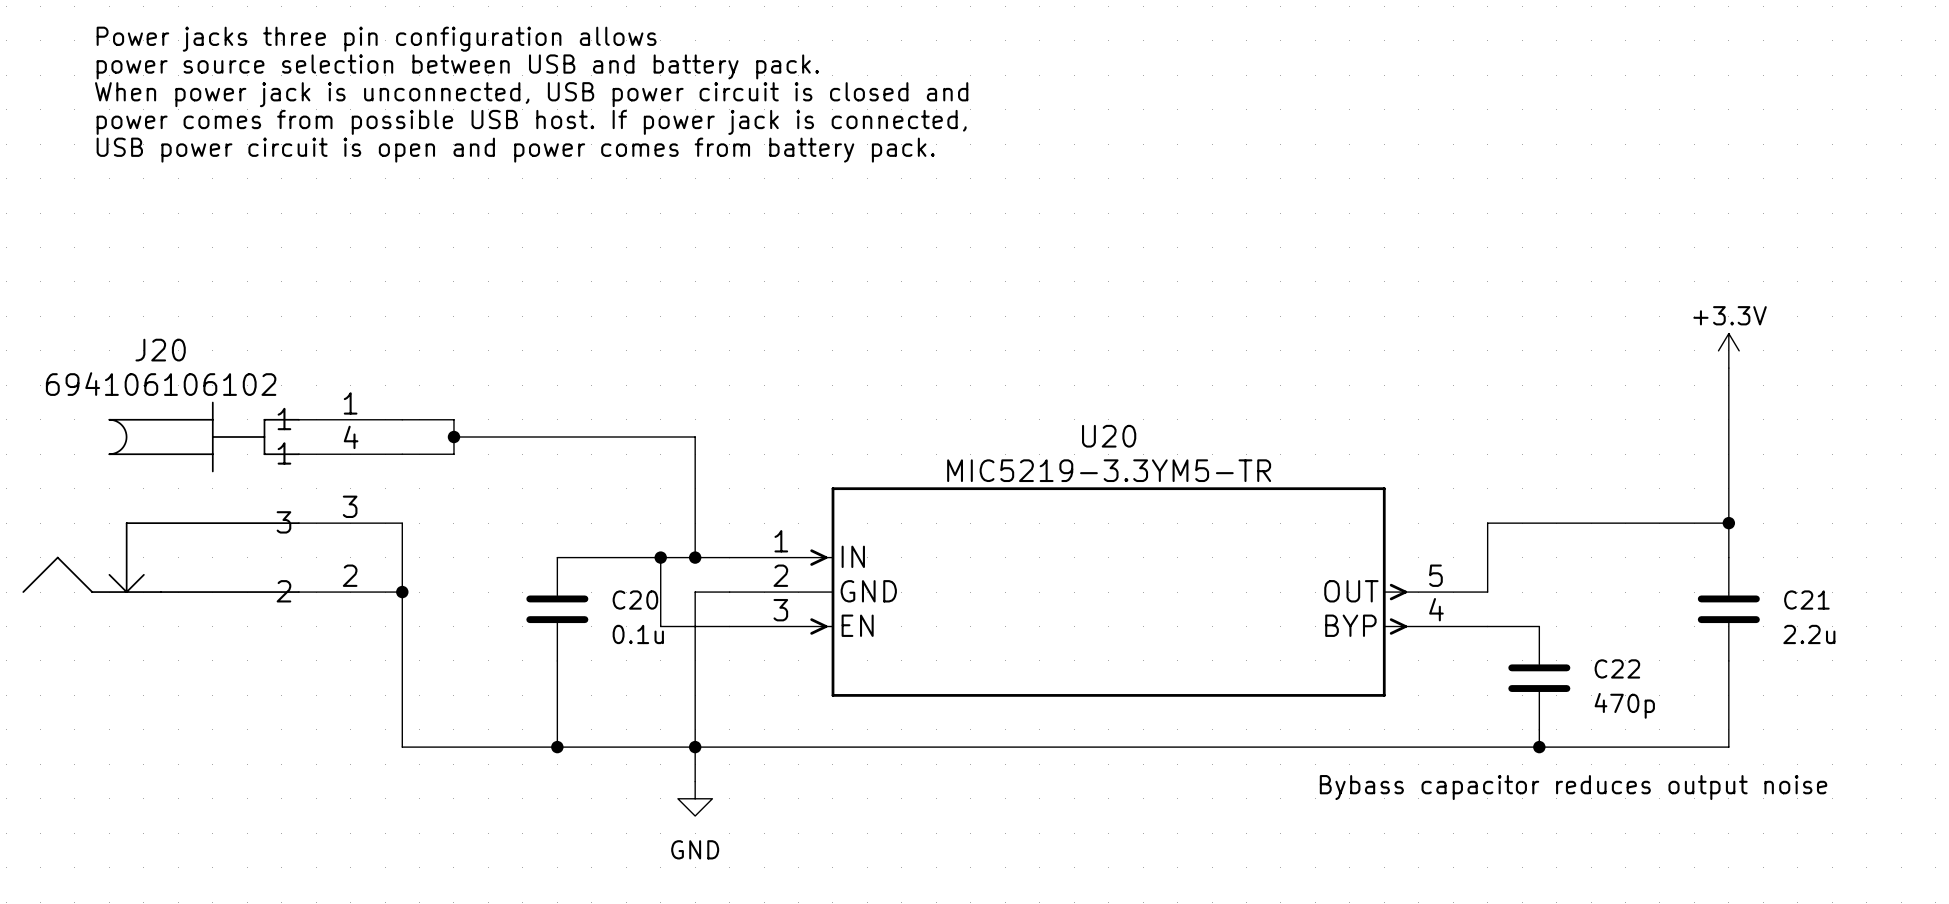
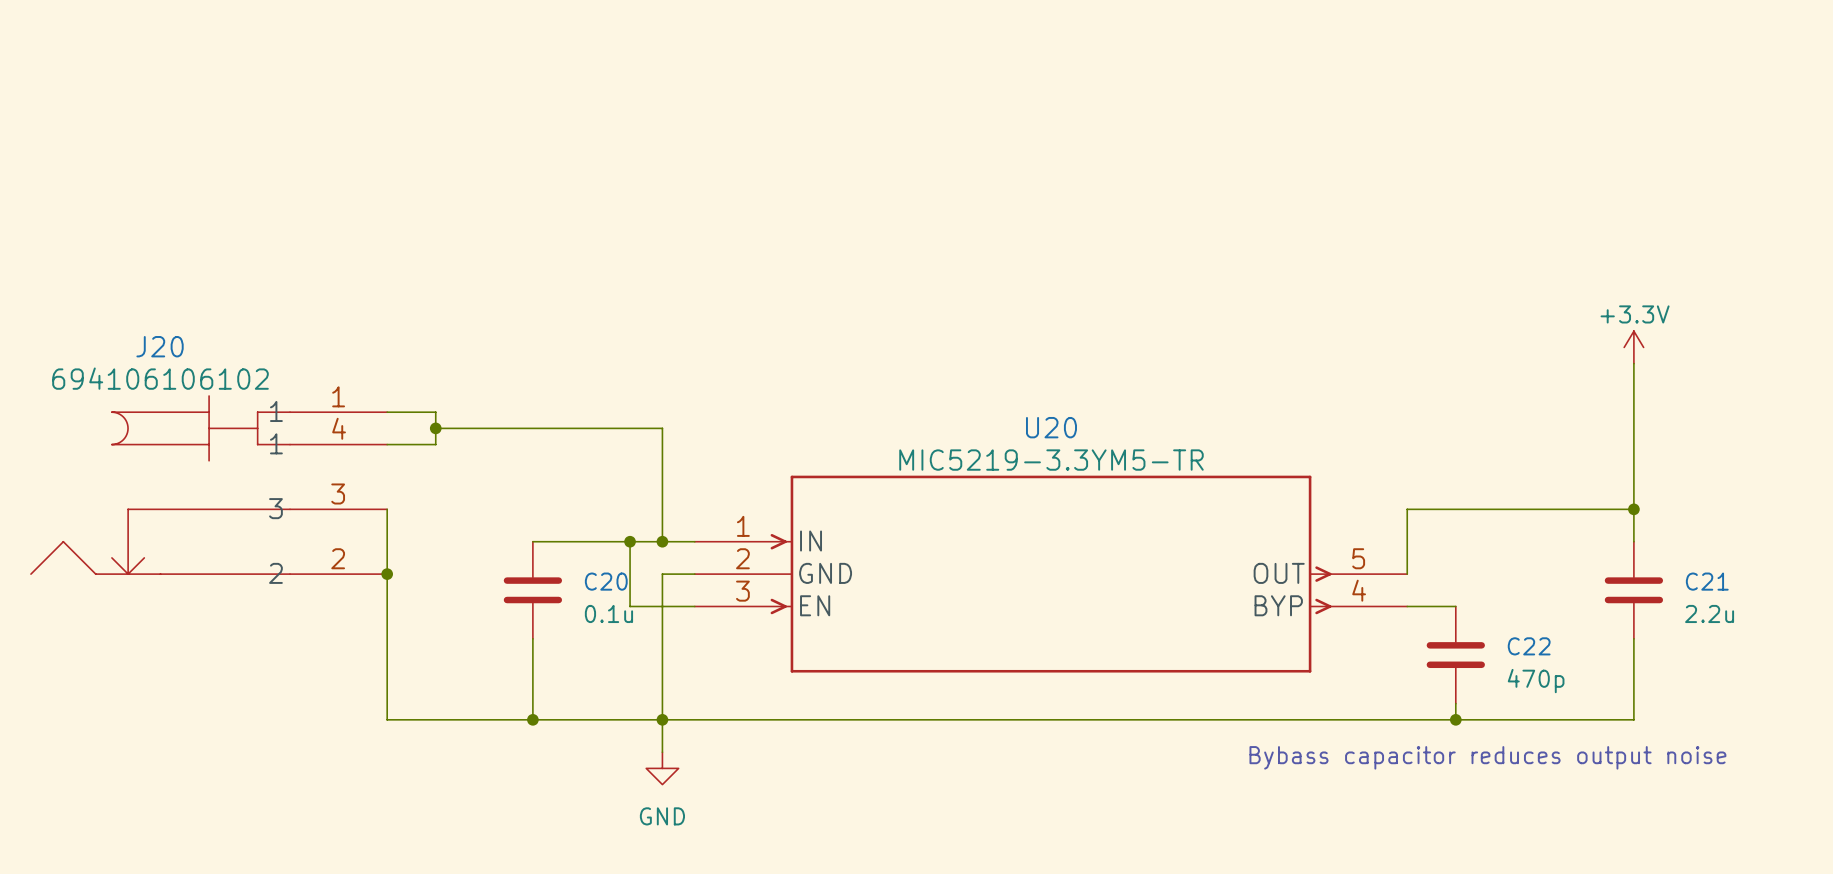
text: Power jacks three pin configuration allows (376, 39) -> none
text: power source selection between USB and battery pack. (457, 66) -> none
text: When power jack is unconnected, USB power circuit is closed and (531, 94) -> none
text: power comes from possible USB host. If power jack is connected, (531, 122) -> none
text: USB power circuit is open and power comes from battery pack. (515, 150) -> none

